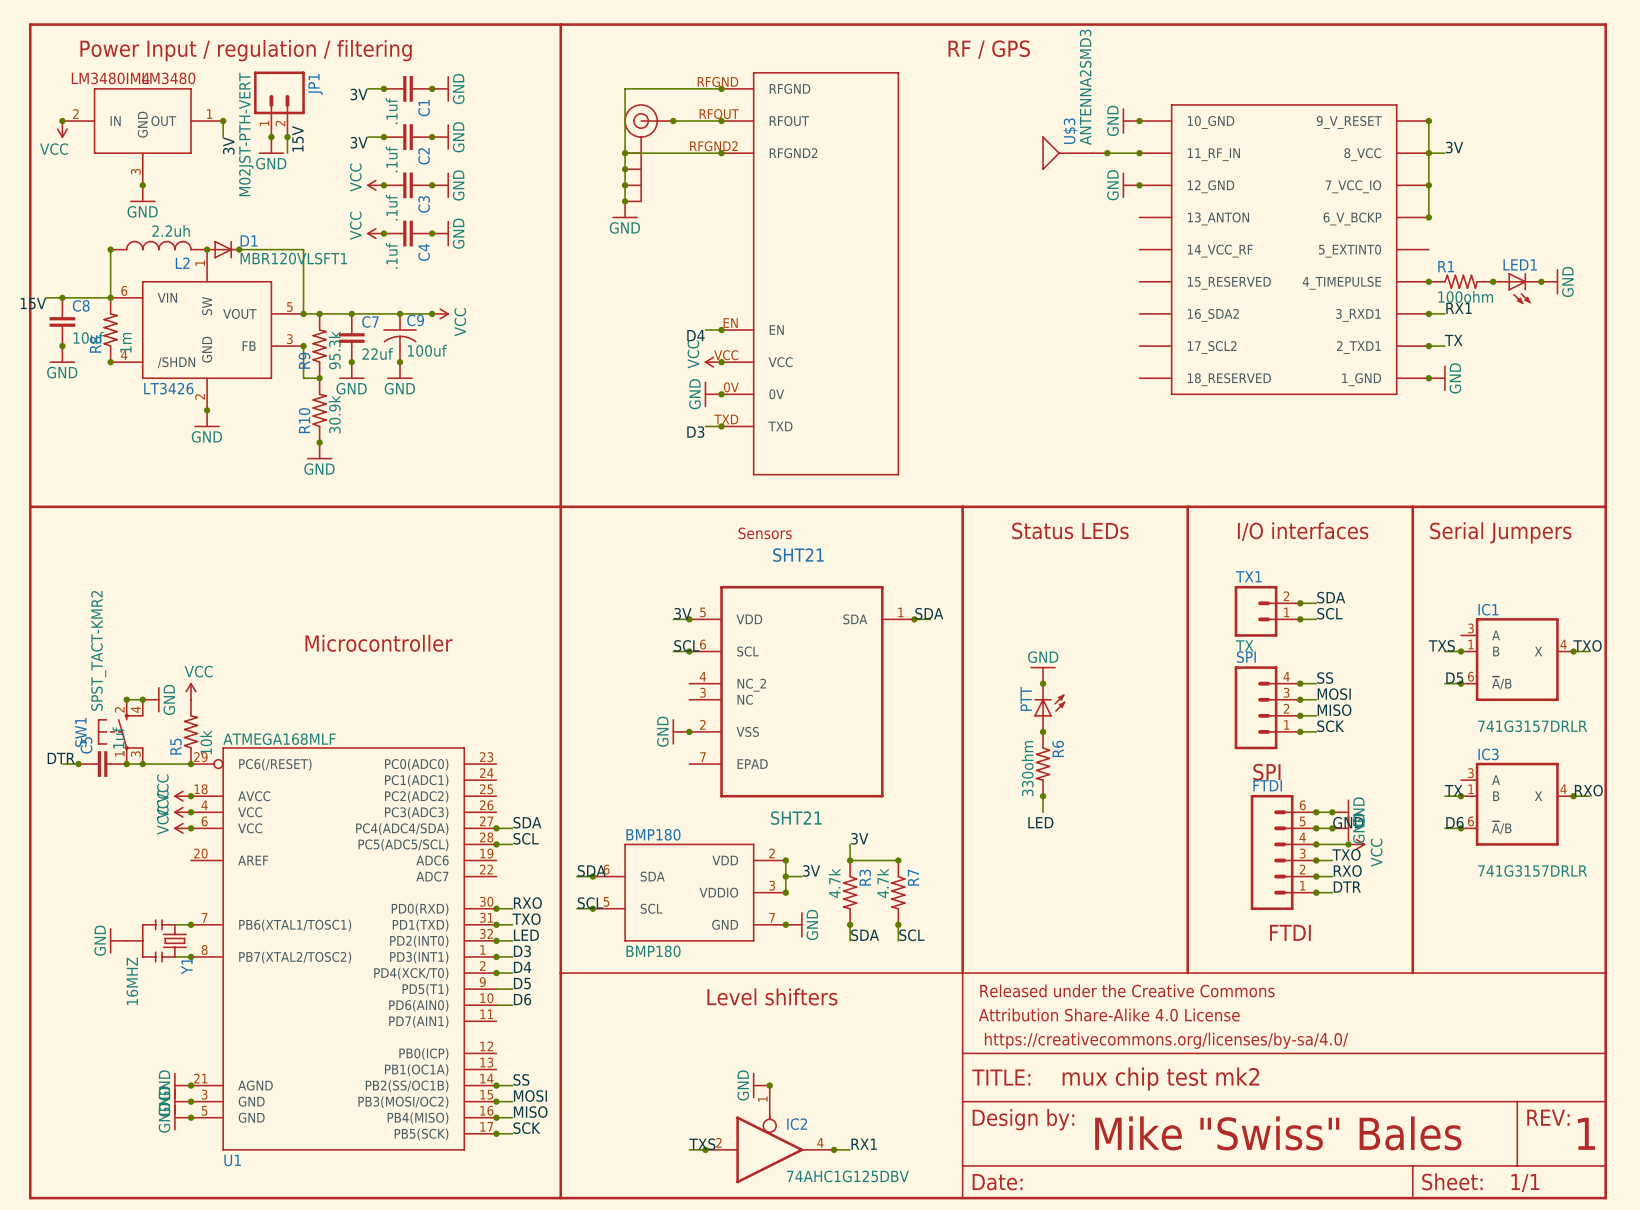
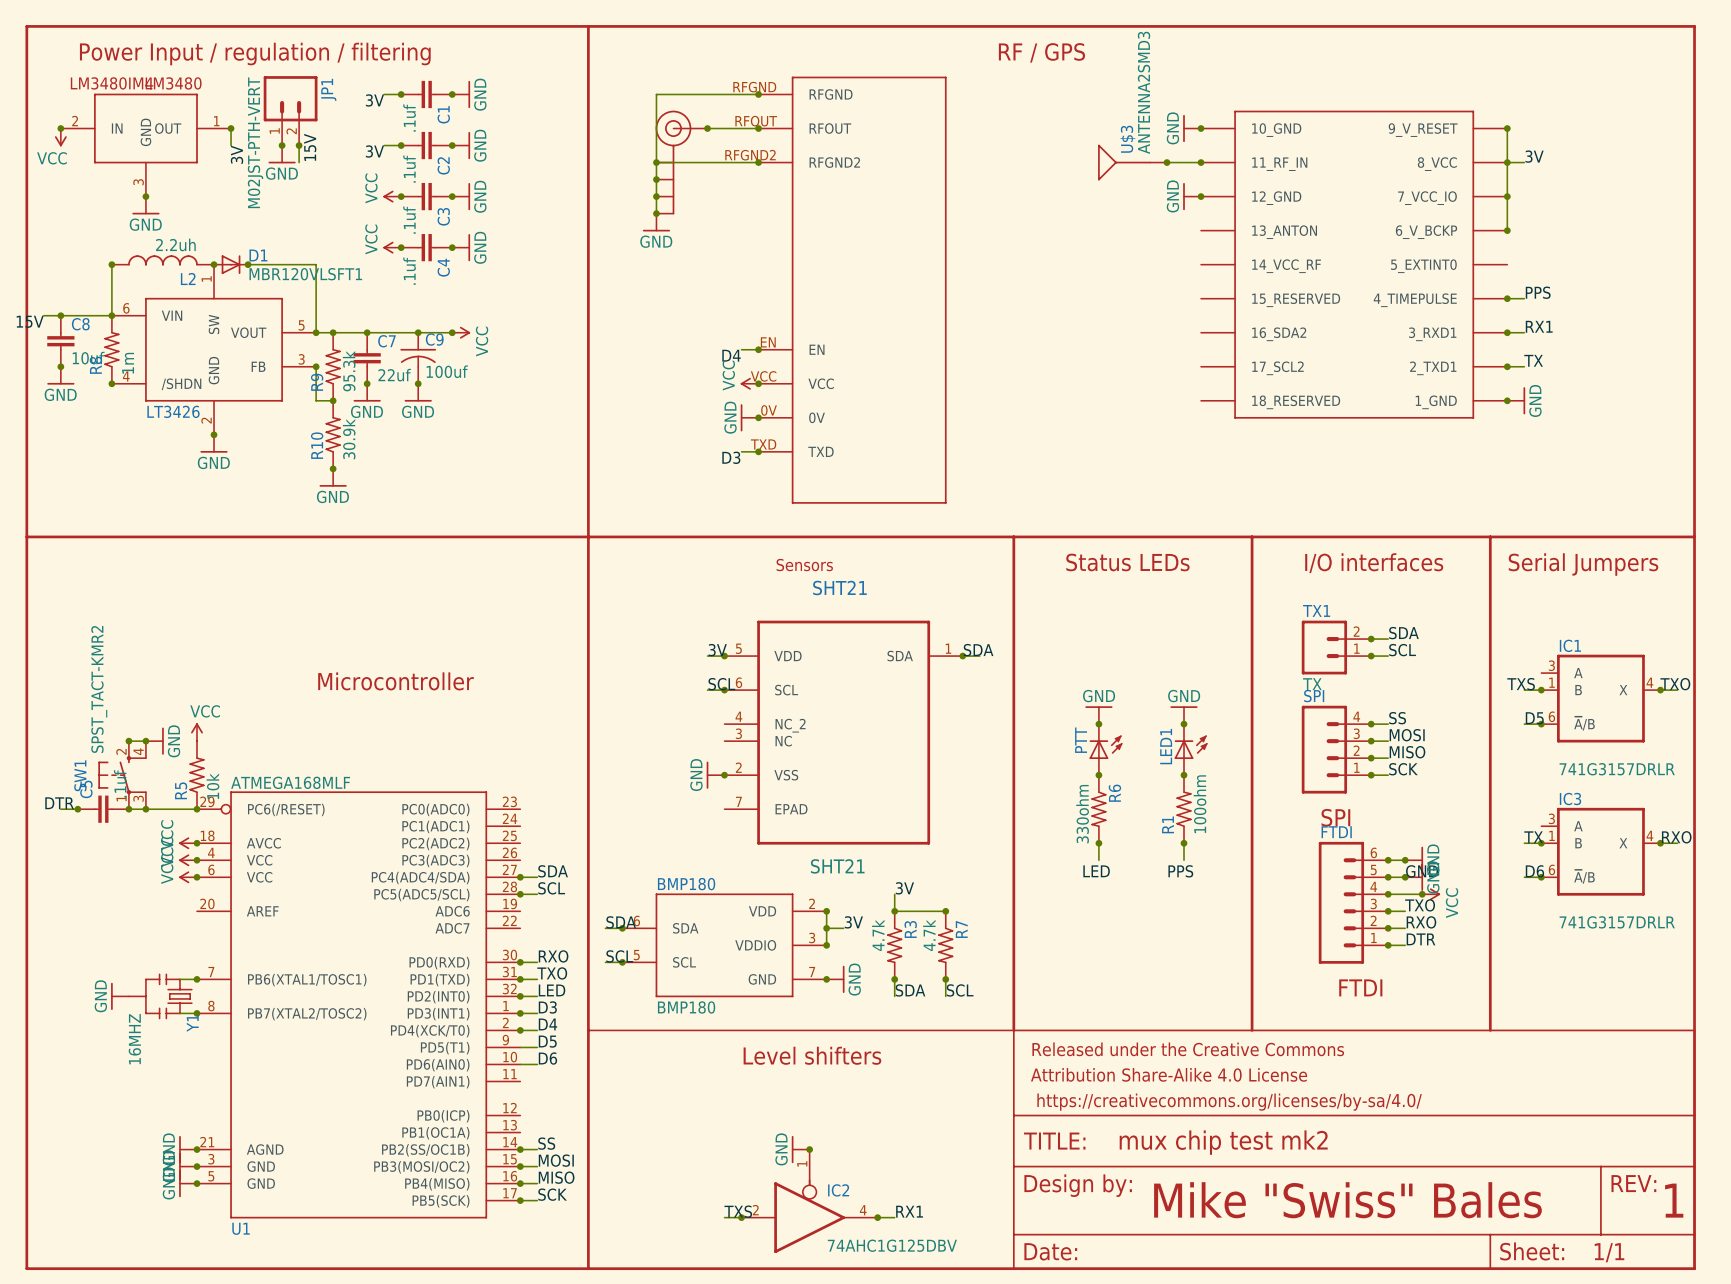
label: none -> PPS (1538, 292)
R1 rotation: 0° (1461, 281) -> 90° counterclockwise (1184, 809)
R1 position: (1461, 281) -> (1184, 809)
junction: (1493, 281) -> none
junction: (1541, 281) -> none
power symbol: GND (1549, 281) -> none
LED1 position: (1517, 288) -> (1191, 749)
LED1 rotation: 0° (1519, 288) -> 90° counterclockwise (1191, 747)
power symbol: none -> GND (1184, 715)
junction: none -> (1184, 724)
junction: none -> (1184, 775)
wire: none -> (1184, 843) (1184, 860)
junction: none -> (1184, 843)
label: none -> PPS (1180, 871)

